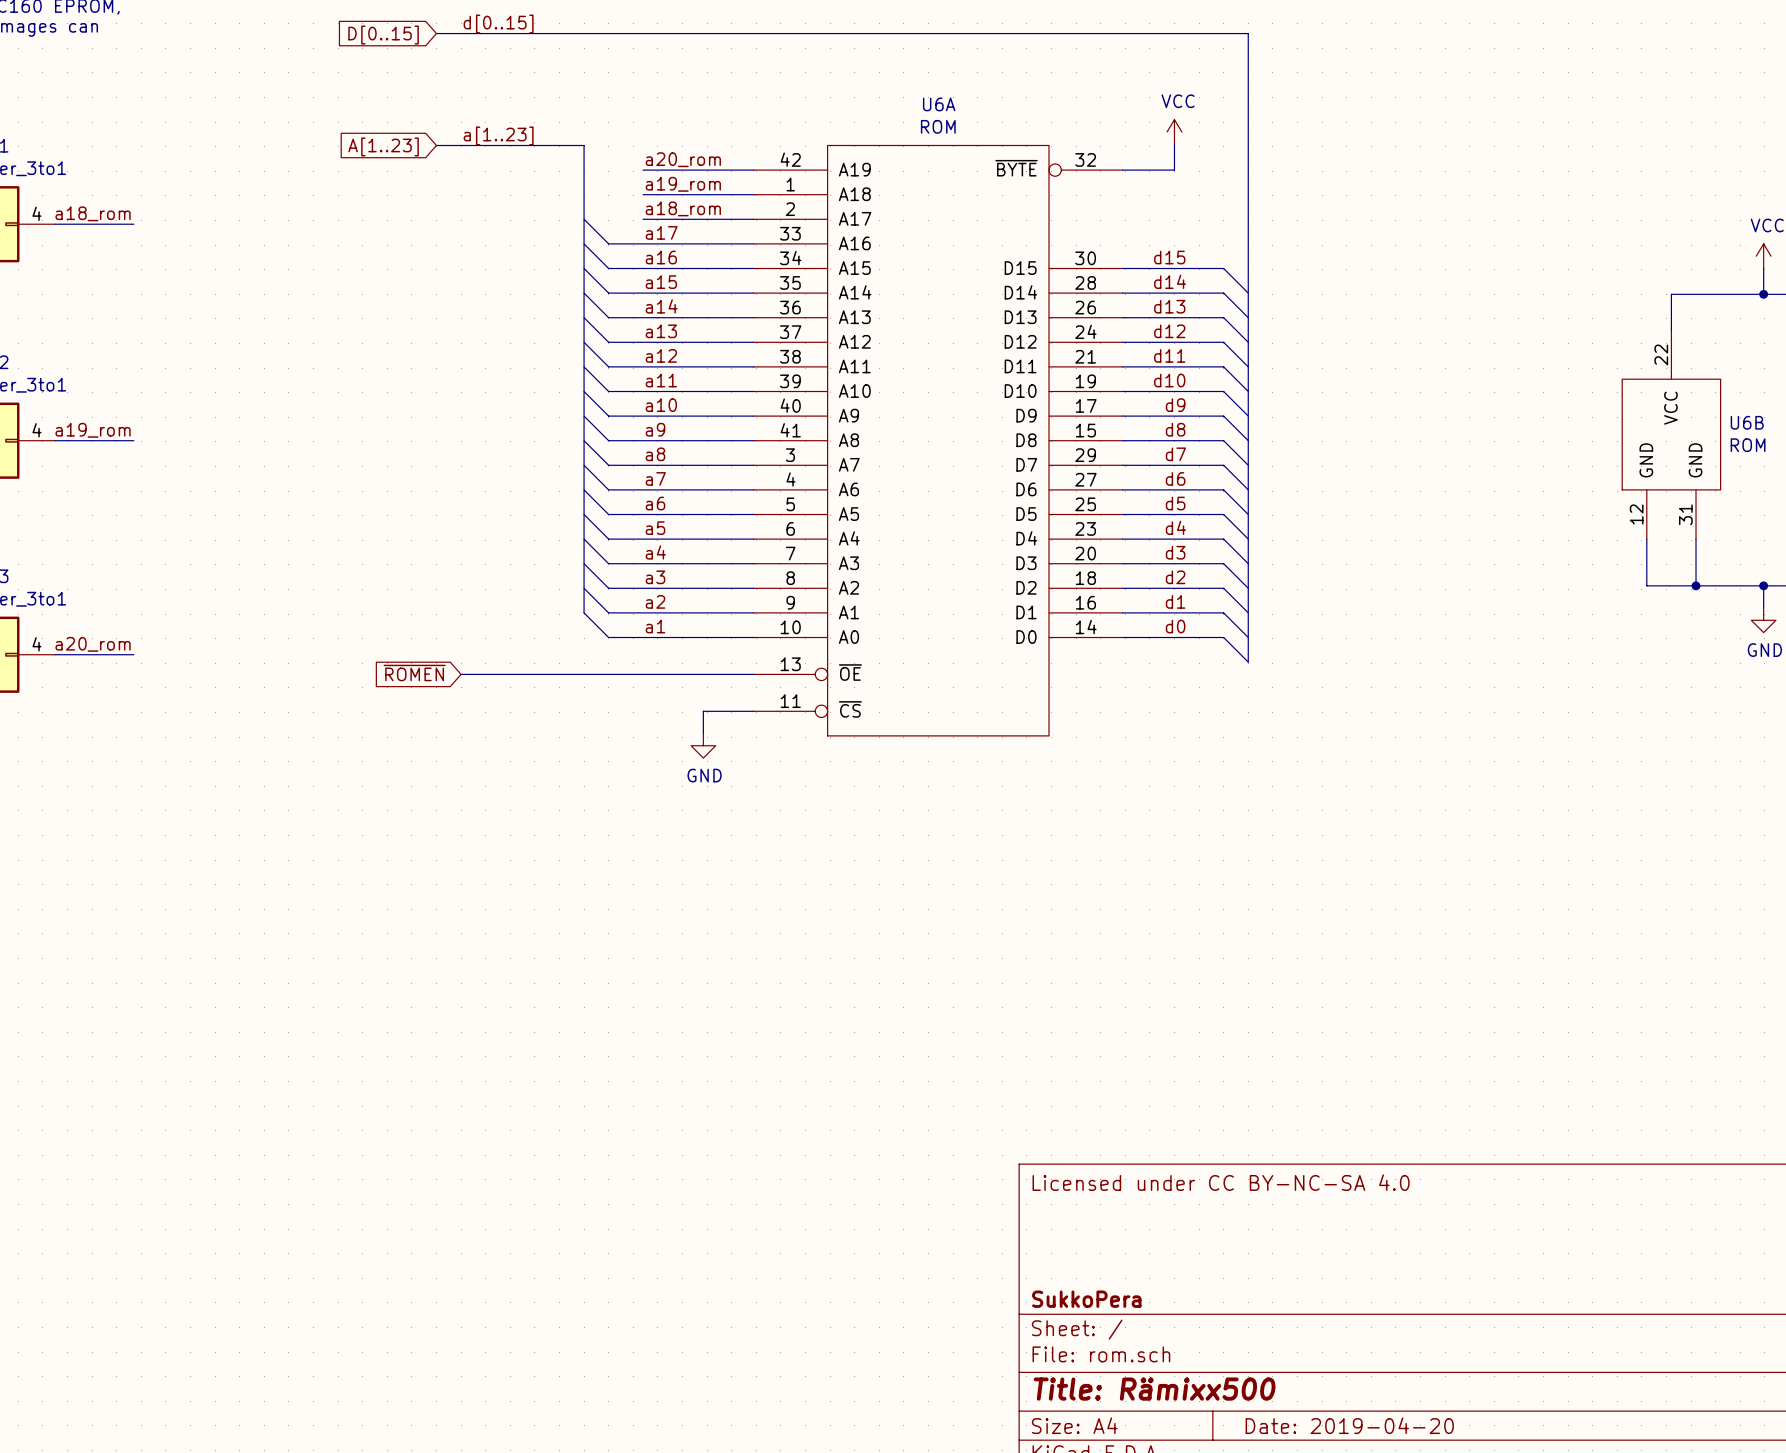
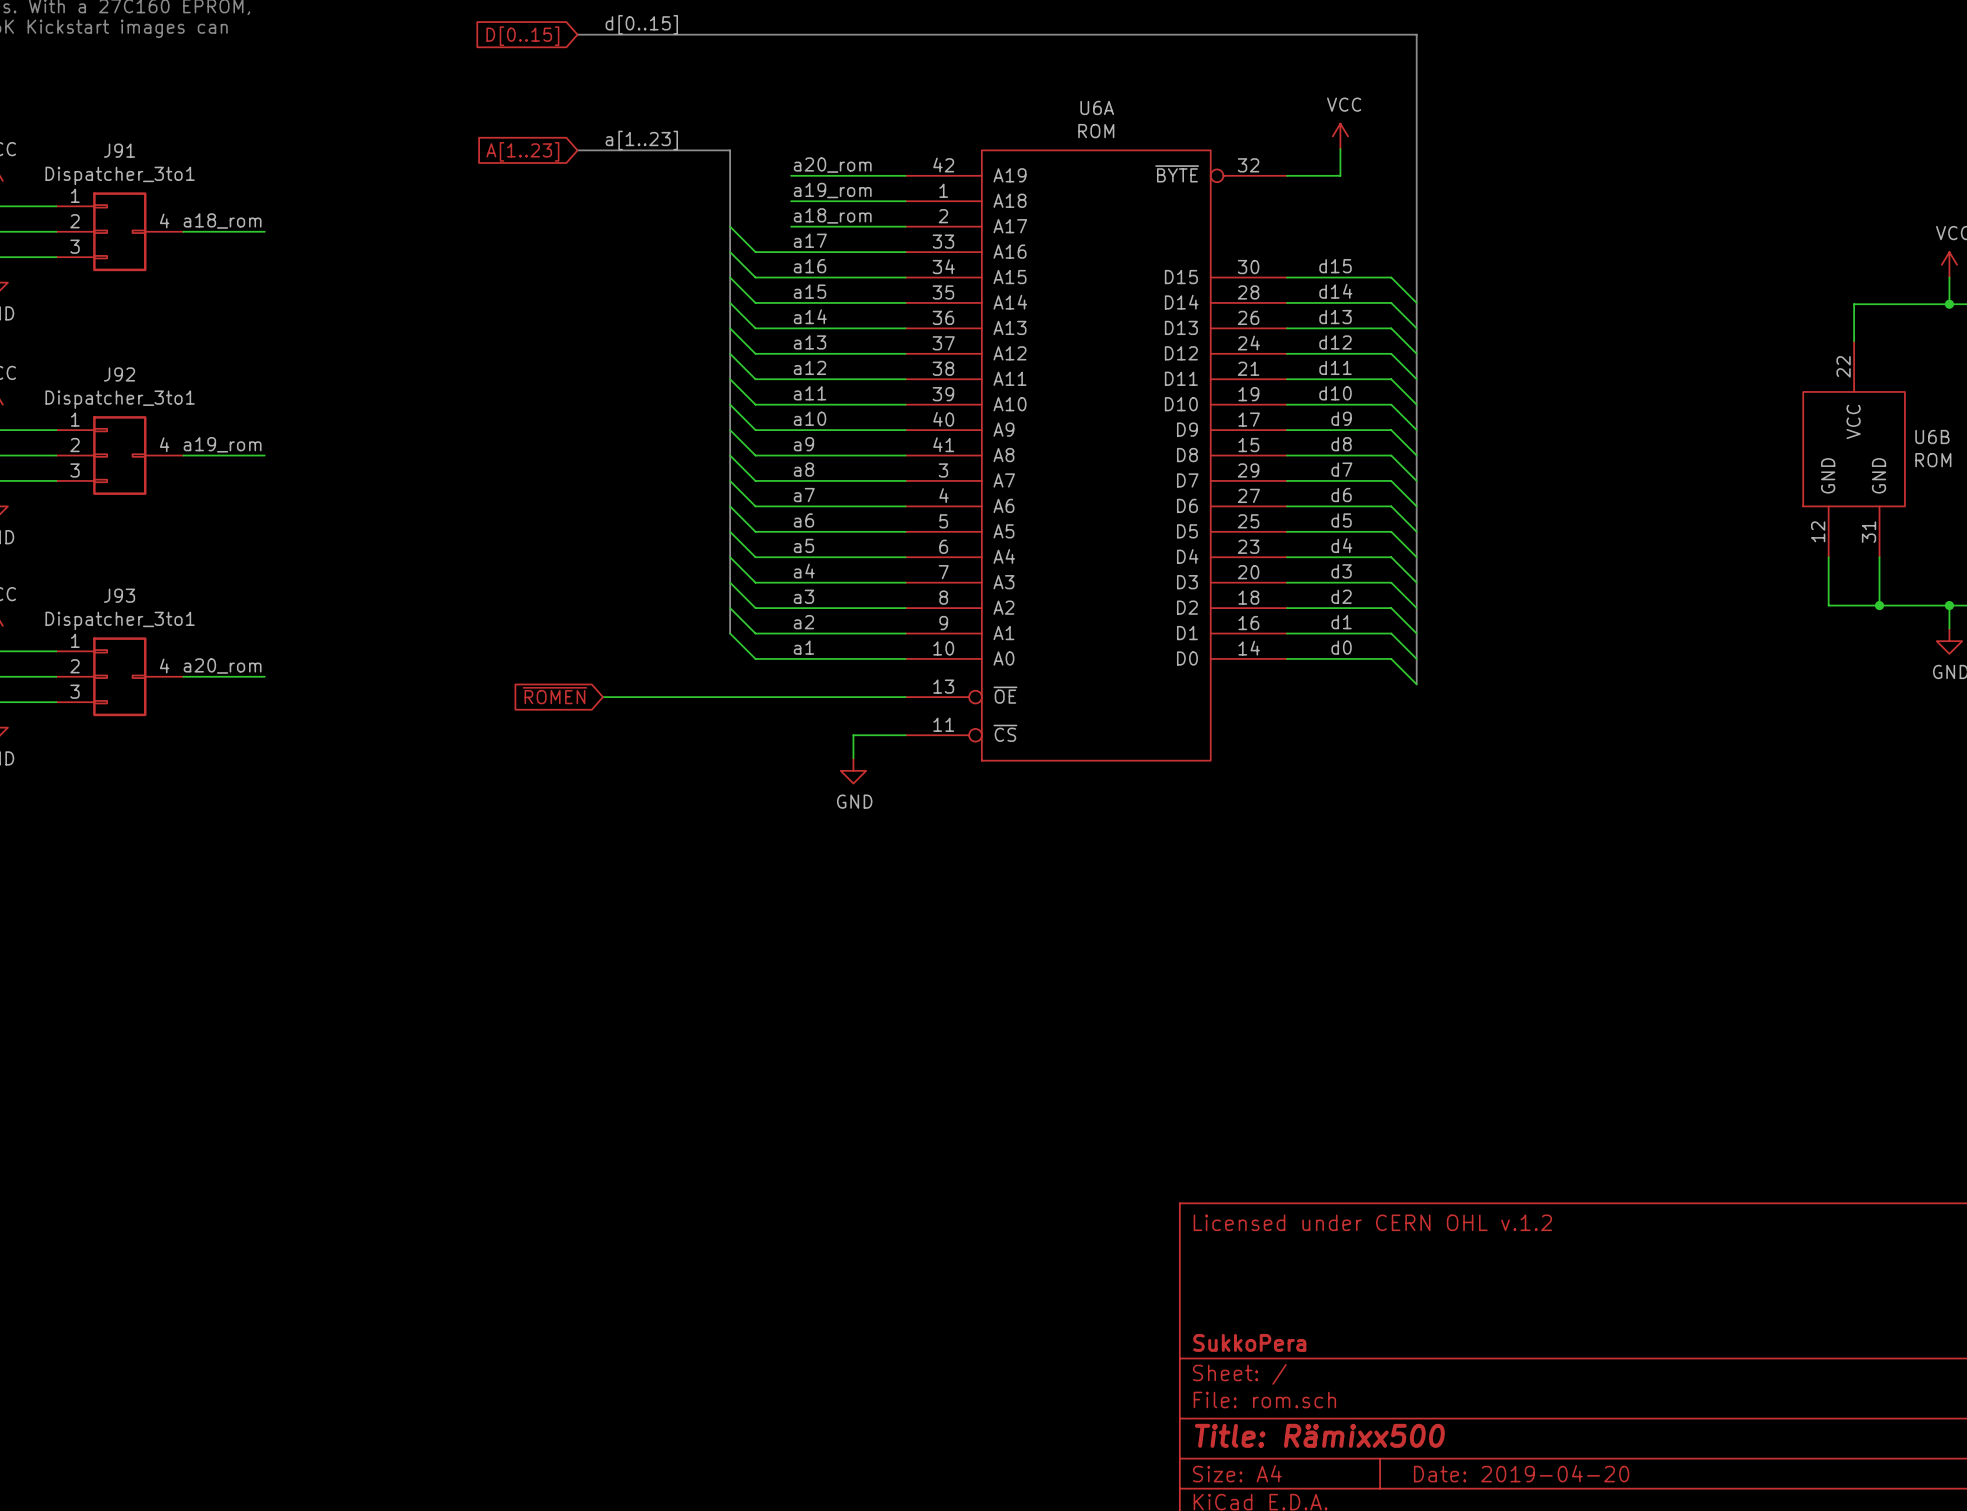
title block: Licensed under CC BY-NC-SA 4.0 (1221, 1182) -> Licensed under CERN OHL v.1.2 (1372, 1222)

